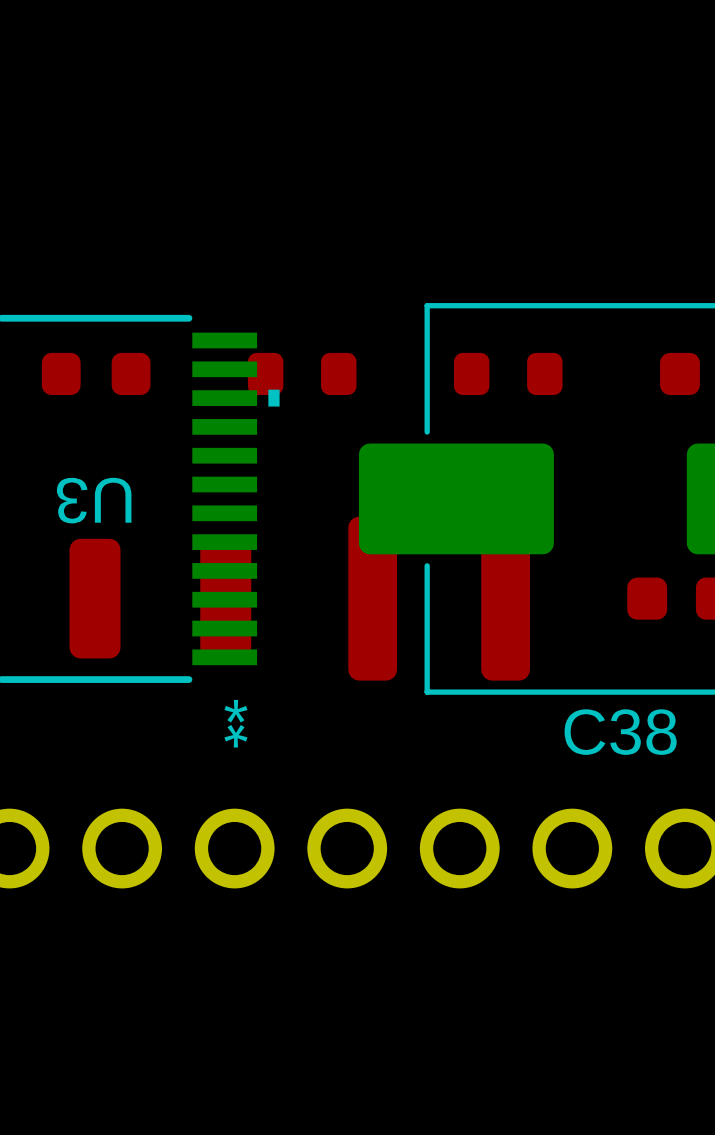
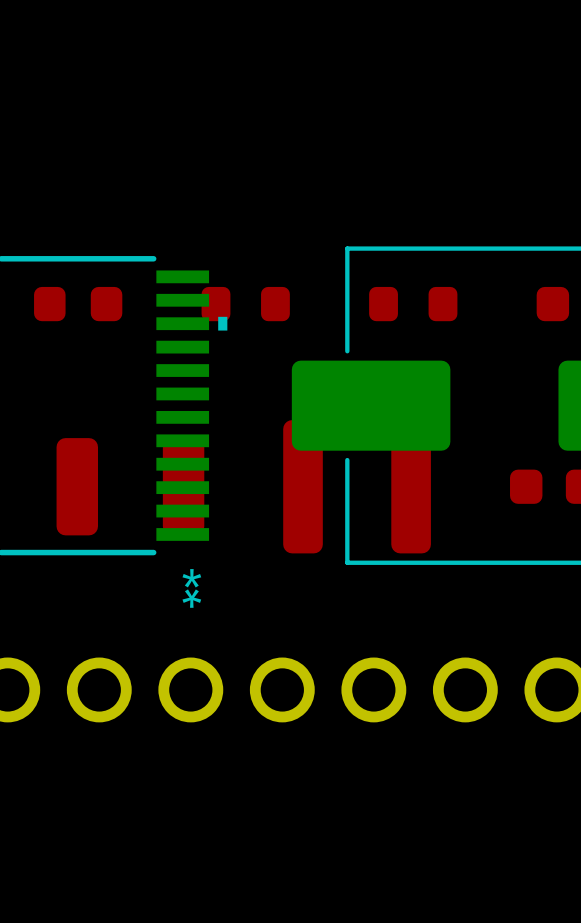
U3 name: U3 (94, 500) -> none
C38 name: C38 (620, 732) -> none

